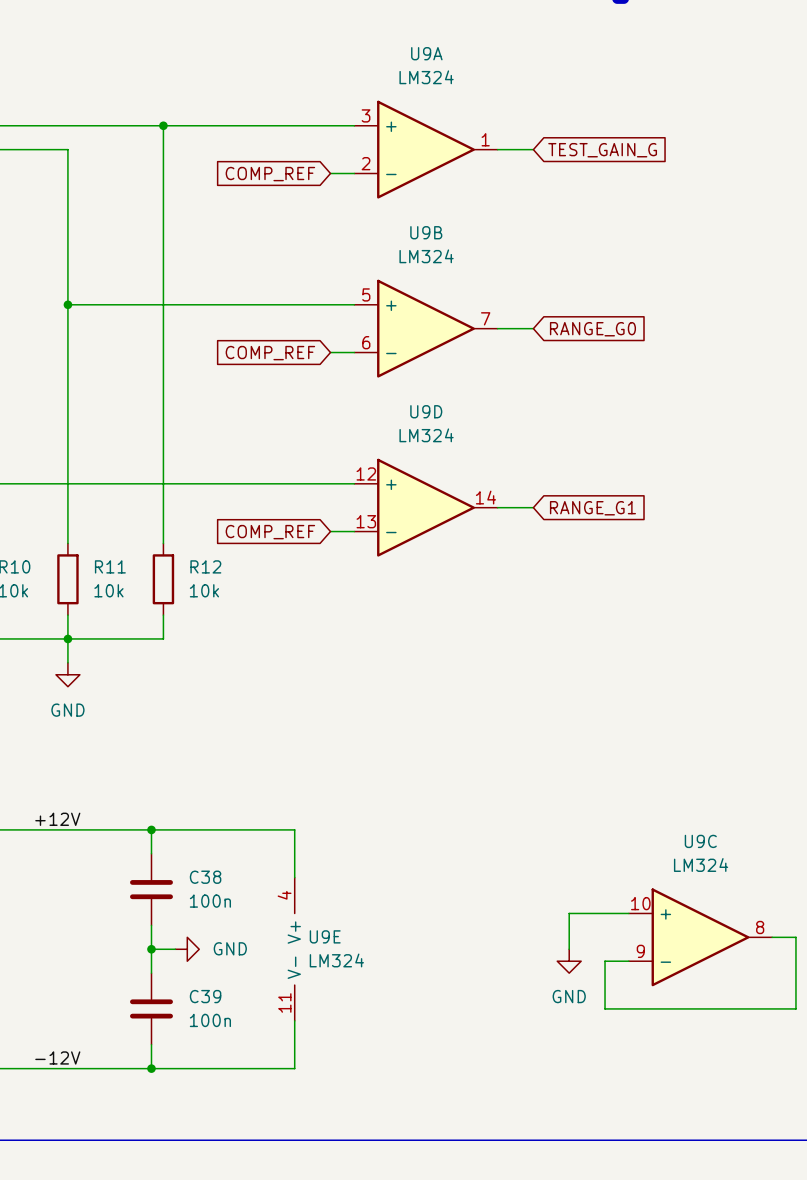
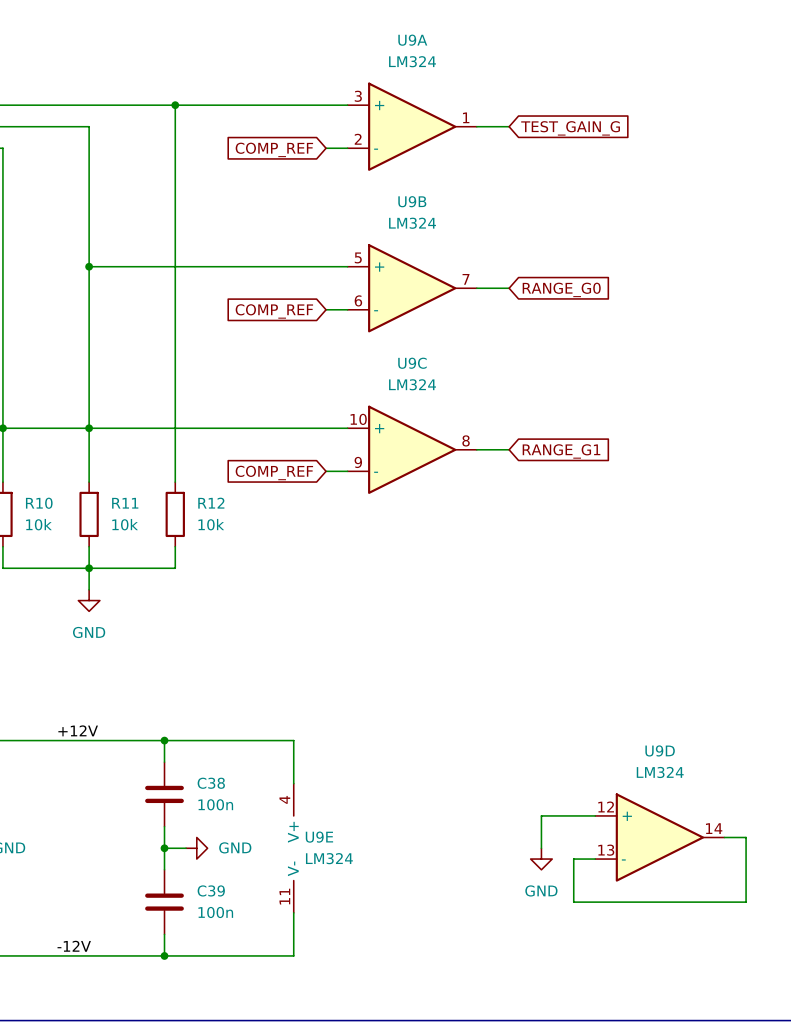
junction: none -> (89, 428)
U9D position: (425, 507) -> (659, 837)
U9C position: (700, 937) -> (412, 449)

